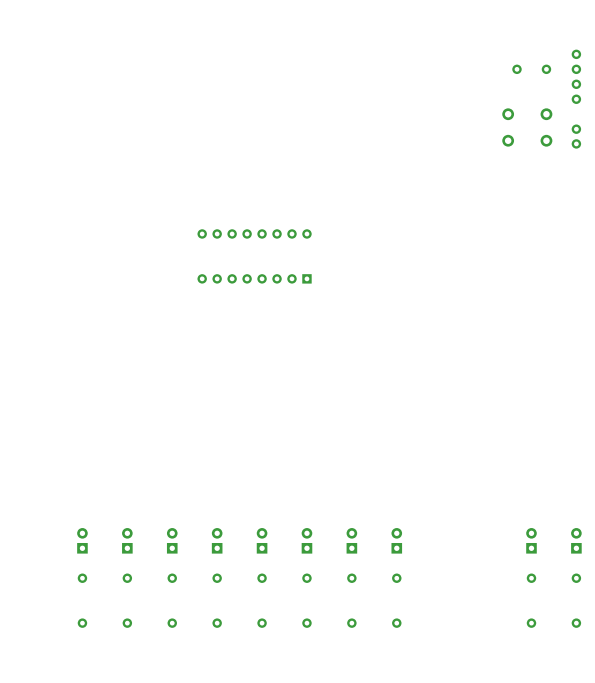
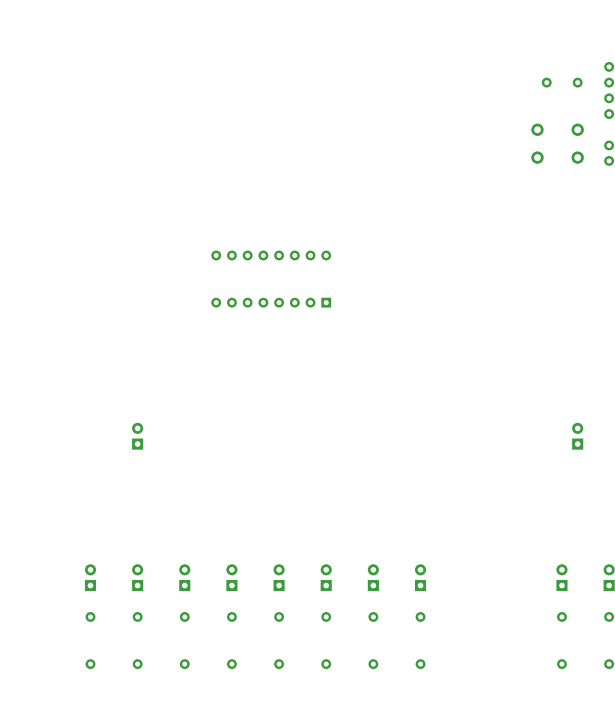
part: none -> (137, 436)
part: none -> (577, 436)

